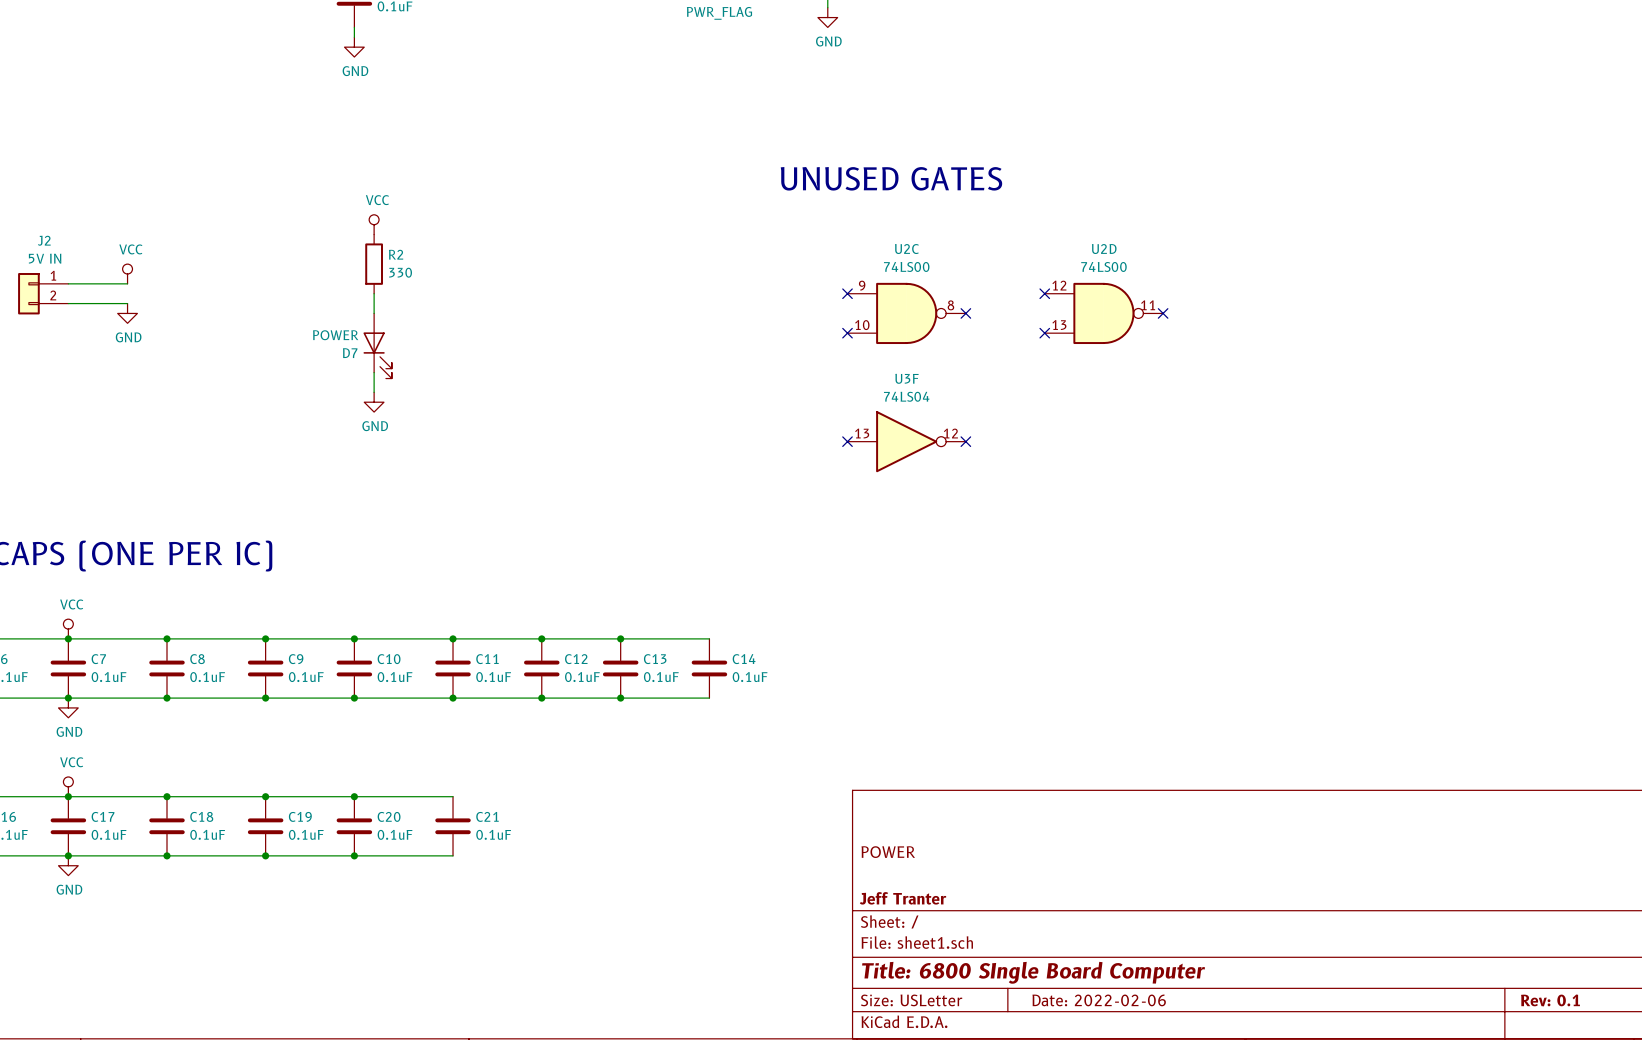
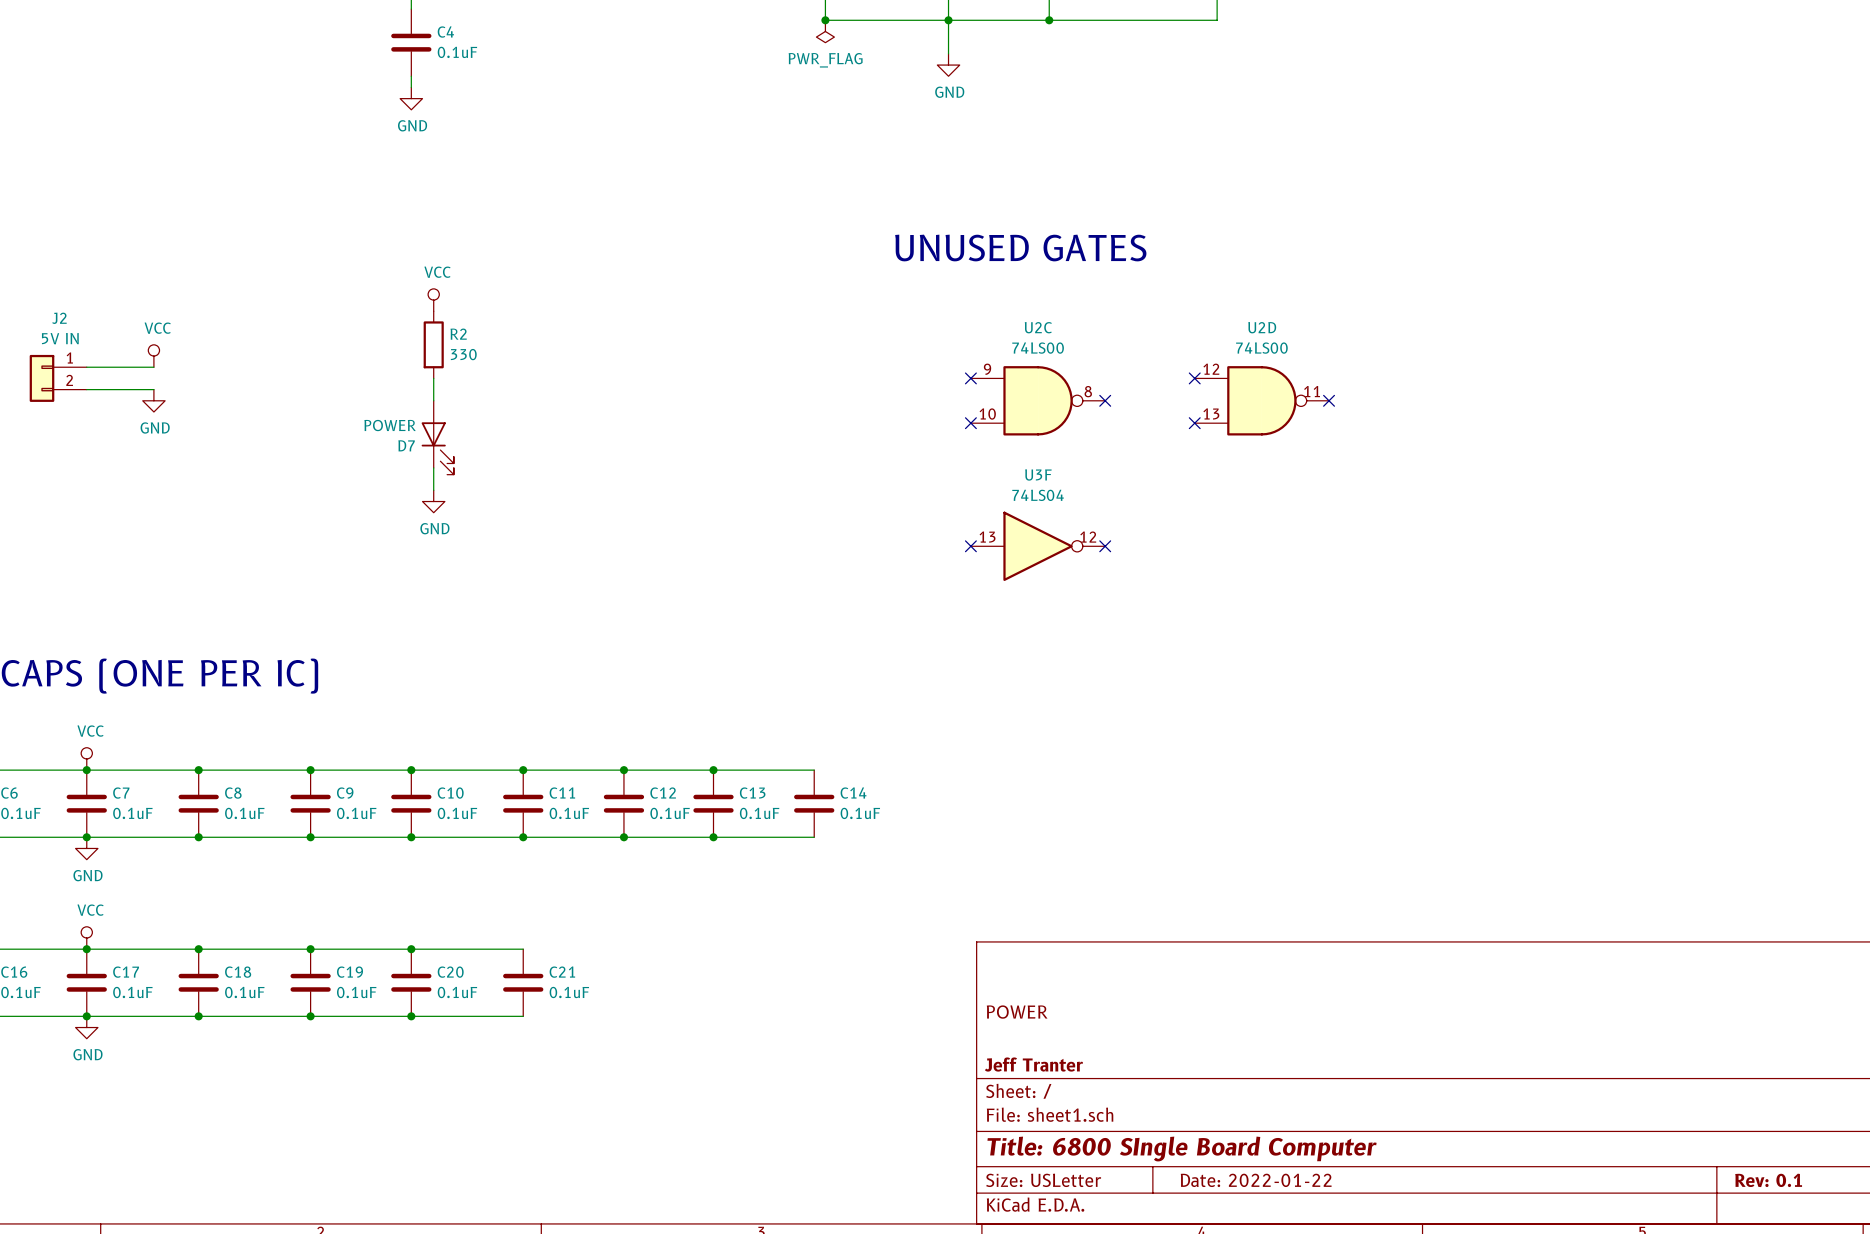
title block: Date: 2022-02-06 (1099, 1000) -> Date: 2022-01-22 (1256, 1180)

